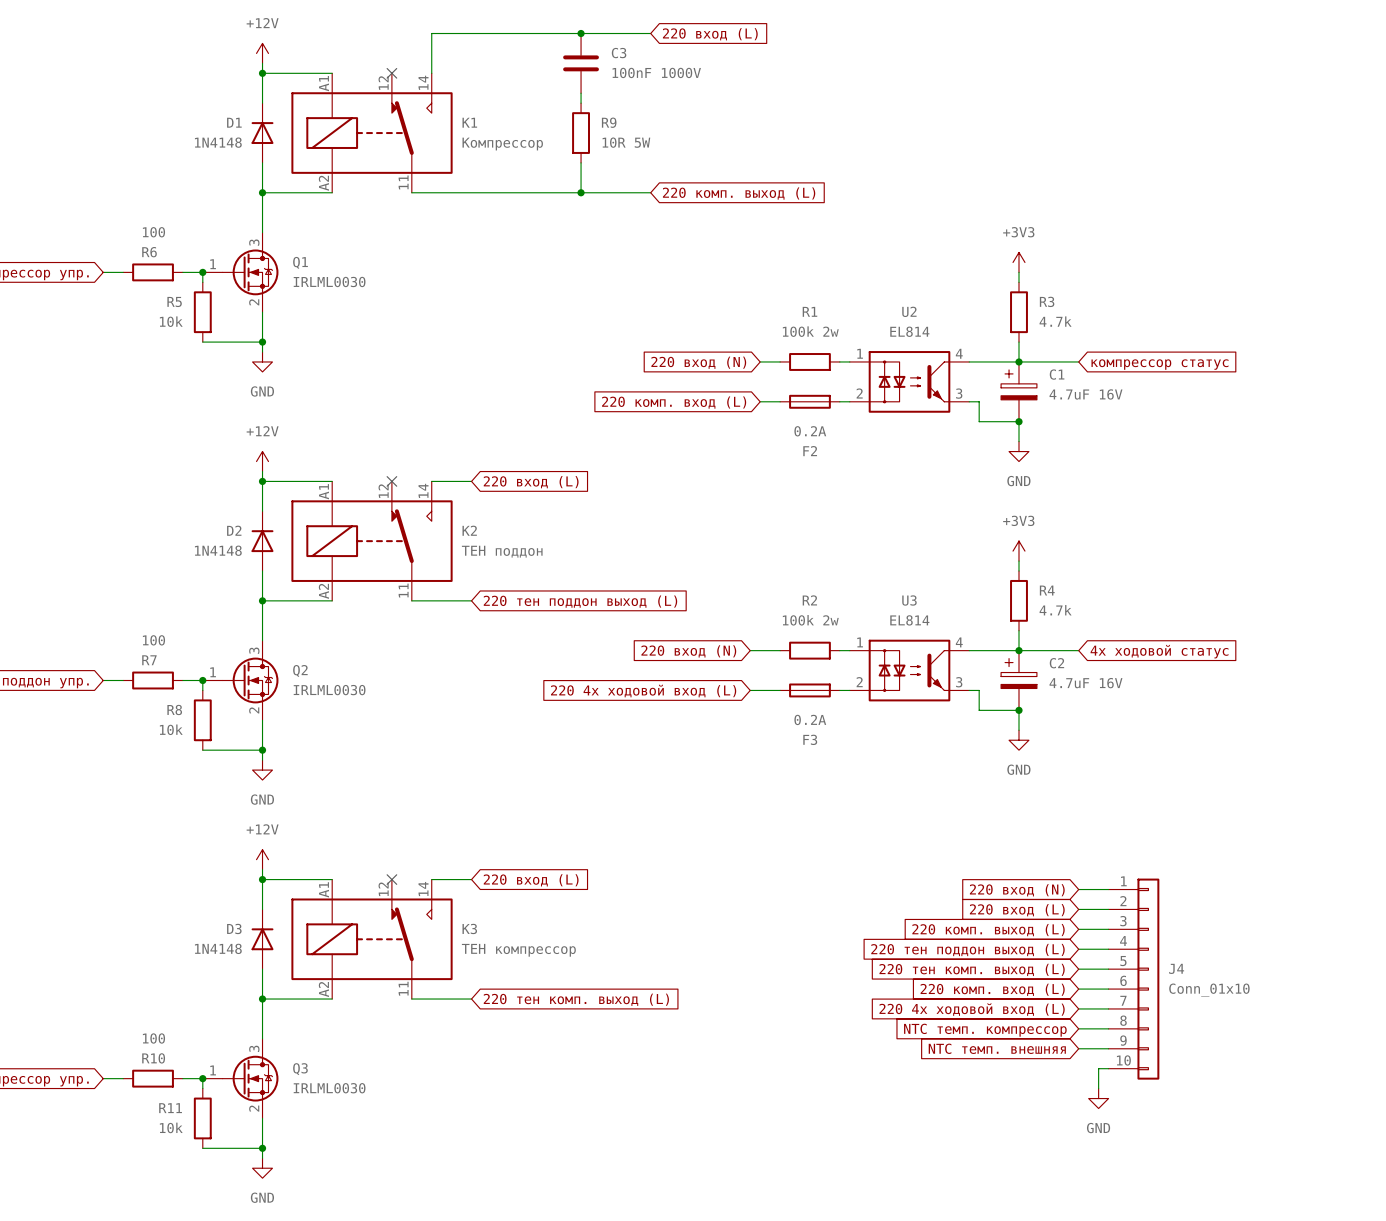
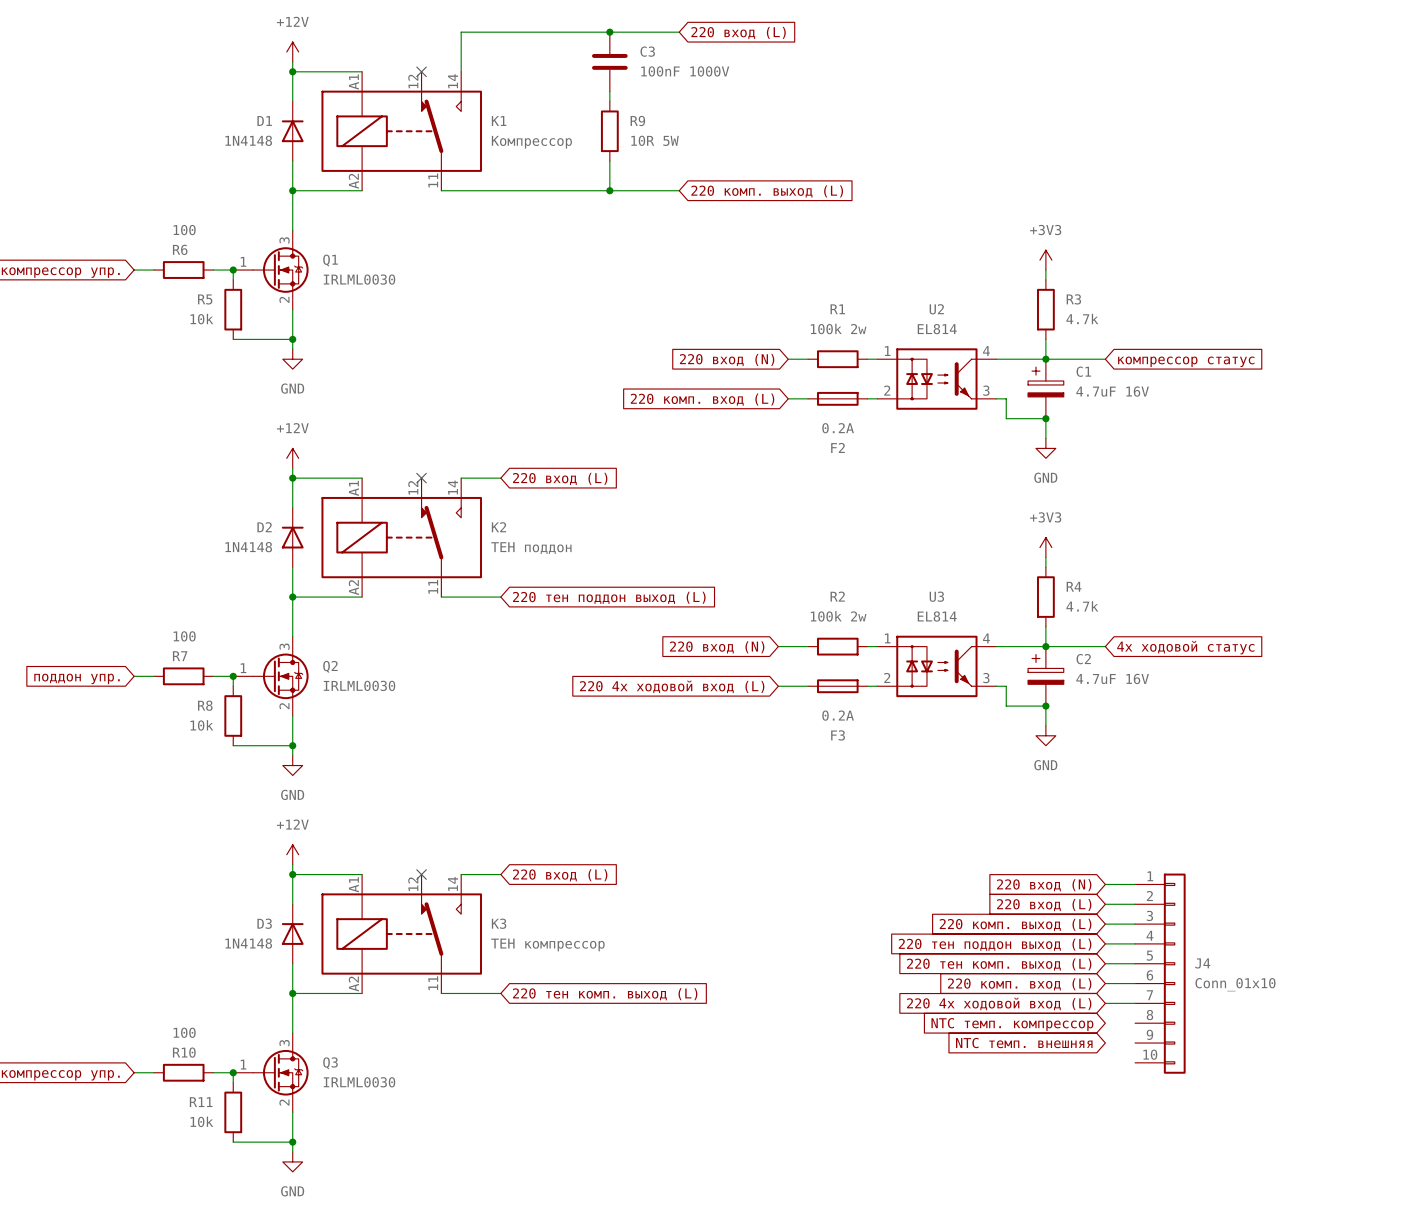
wire: (1078, 1028) (1108, 1028) -> none
wire: (1078, 1048) (1108, 1048) -> none
wire: (1108, 1068) (1098, 1068) (1098, 1088) -> none
power symbol: GND (1098, 1098) -> none

